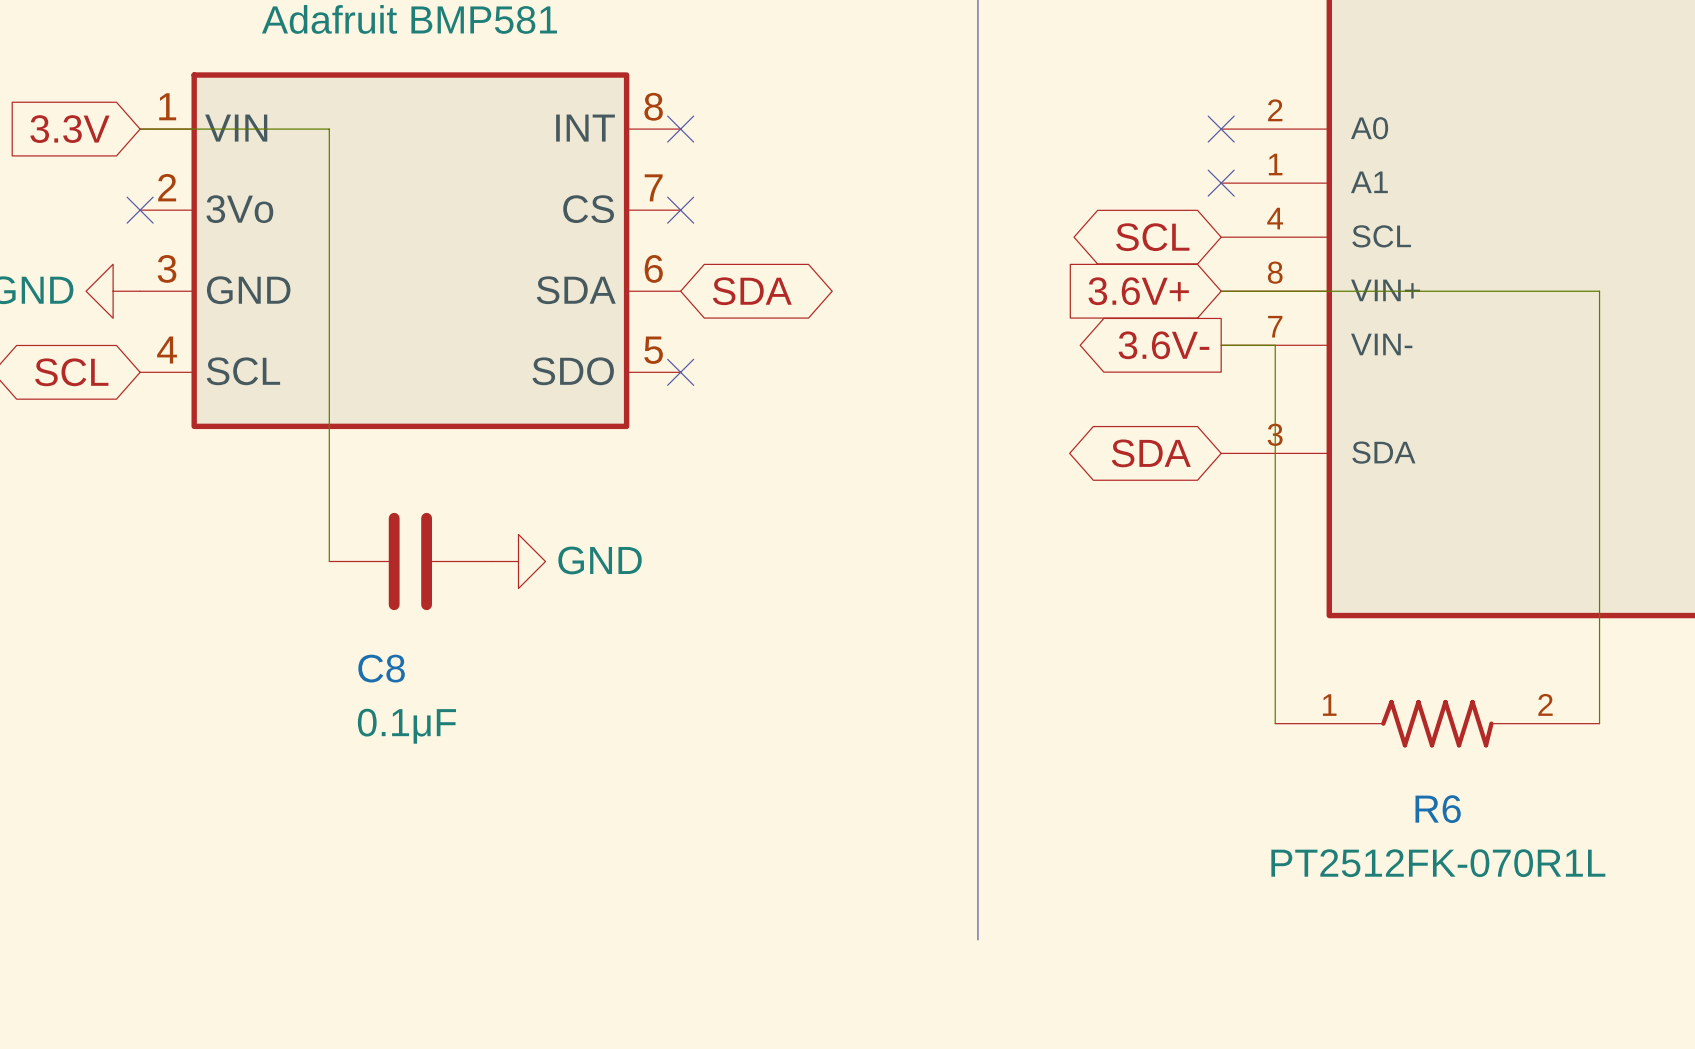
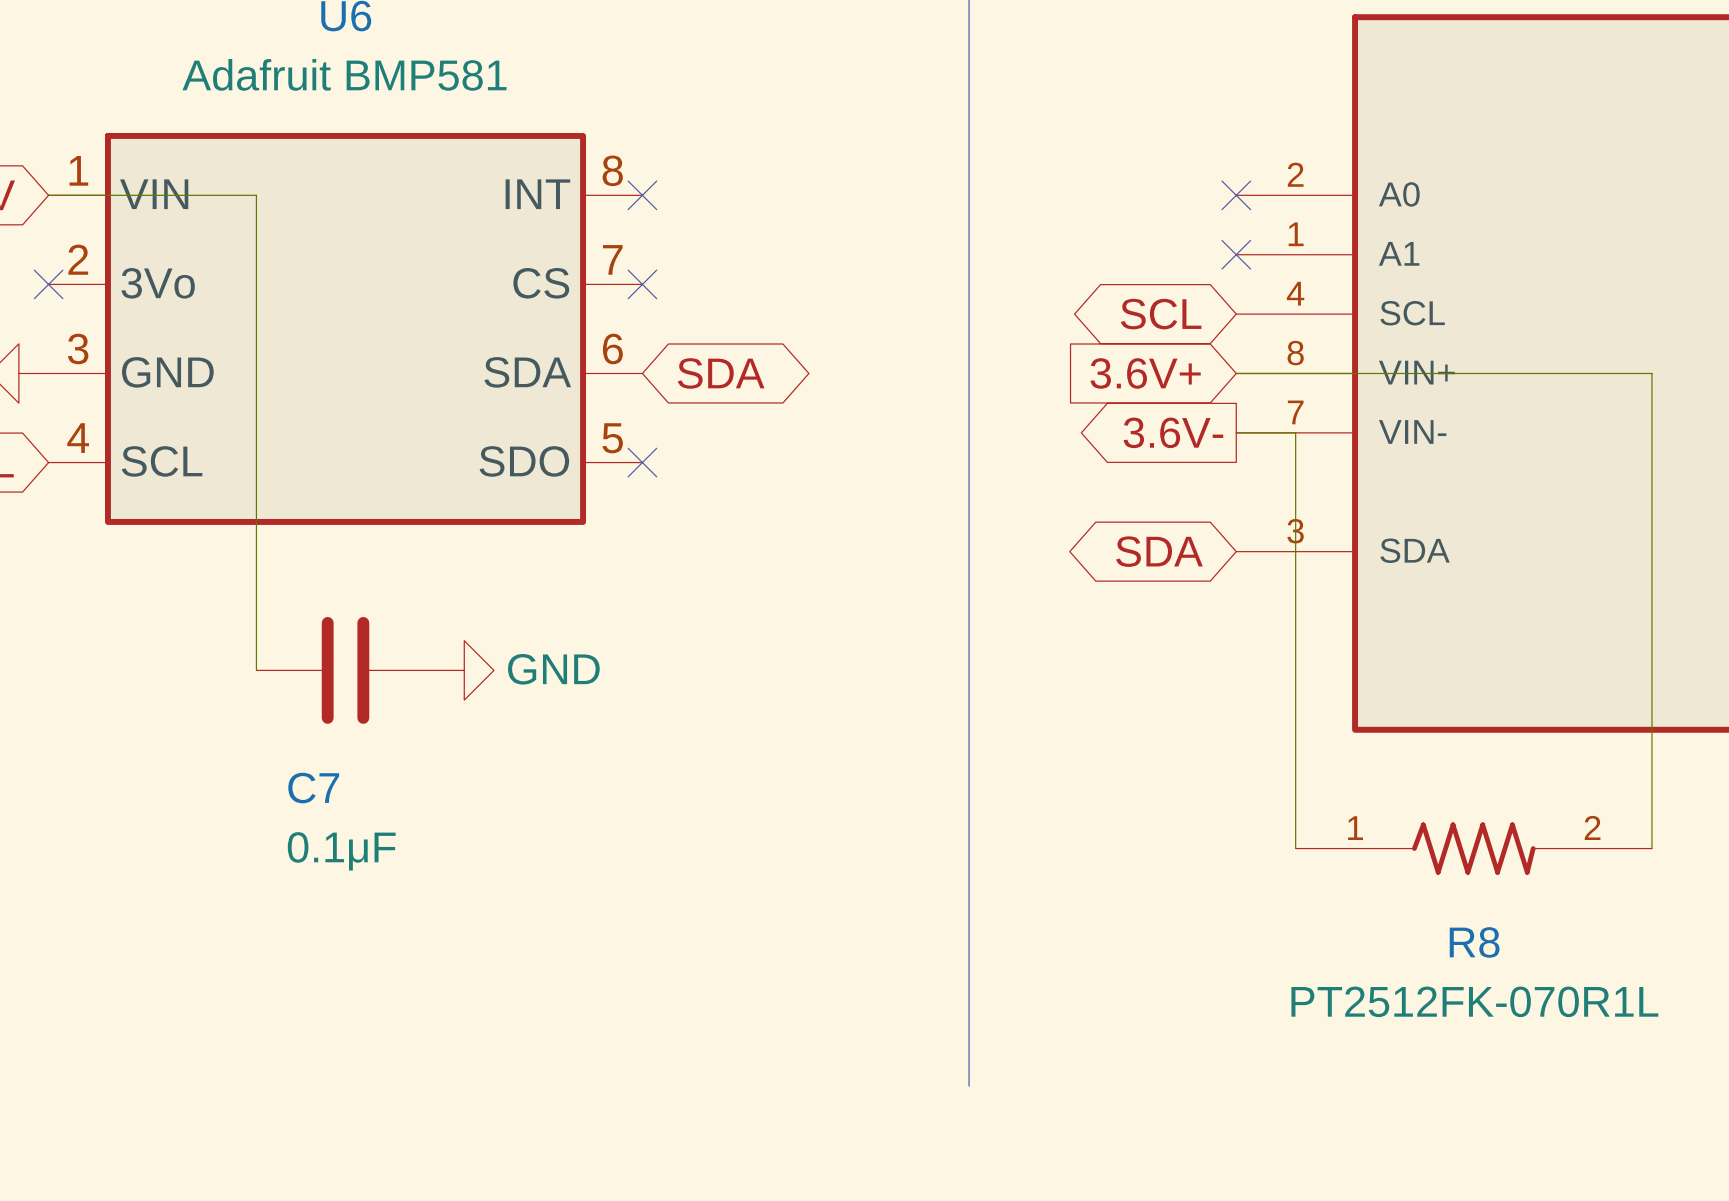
C8 name: C8 (381, 668) -> C7 (313, 788)
R6 name: R6 (1438, 809) -> R8 (1474, 942)

